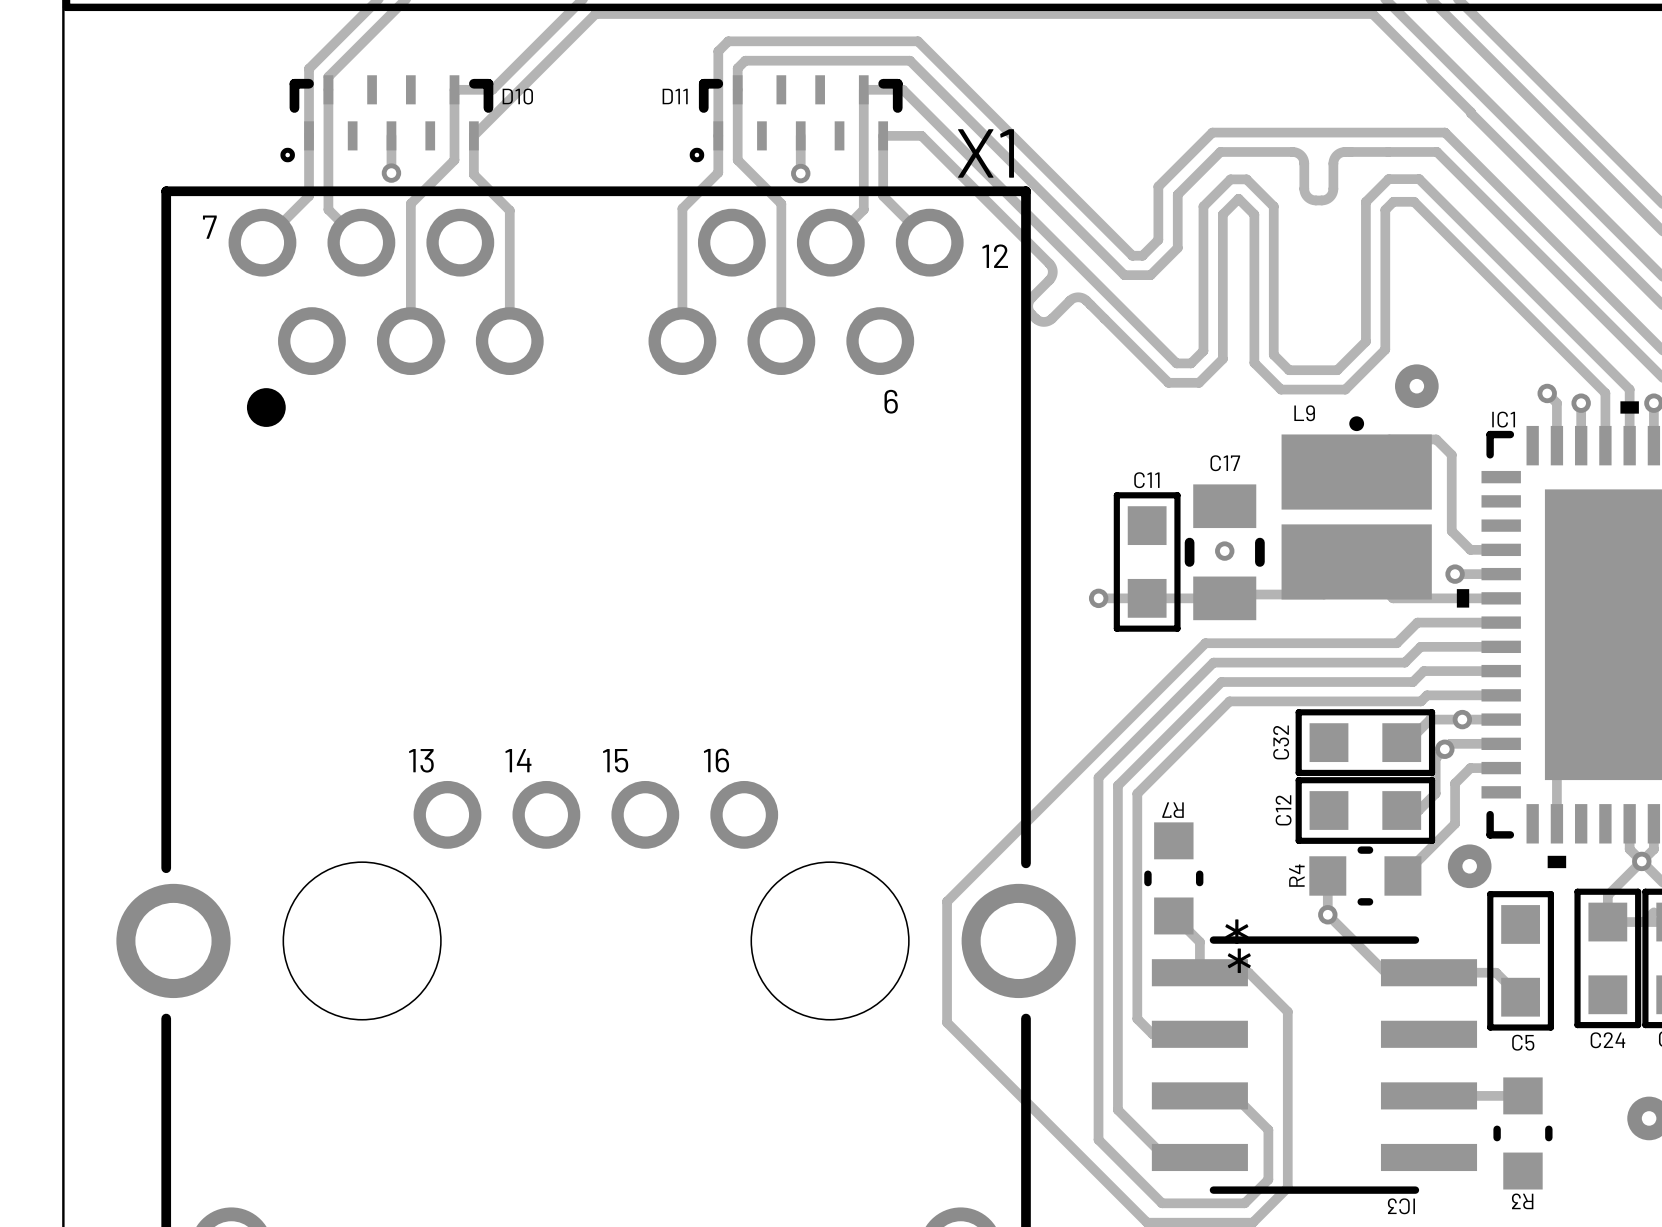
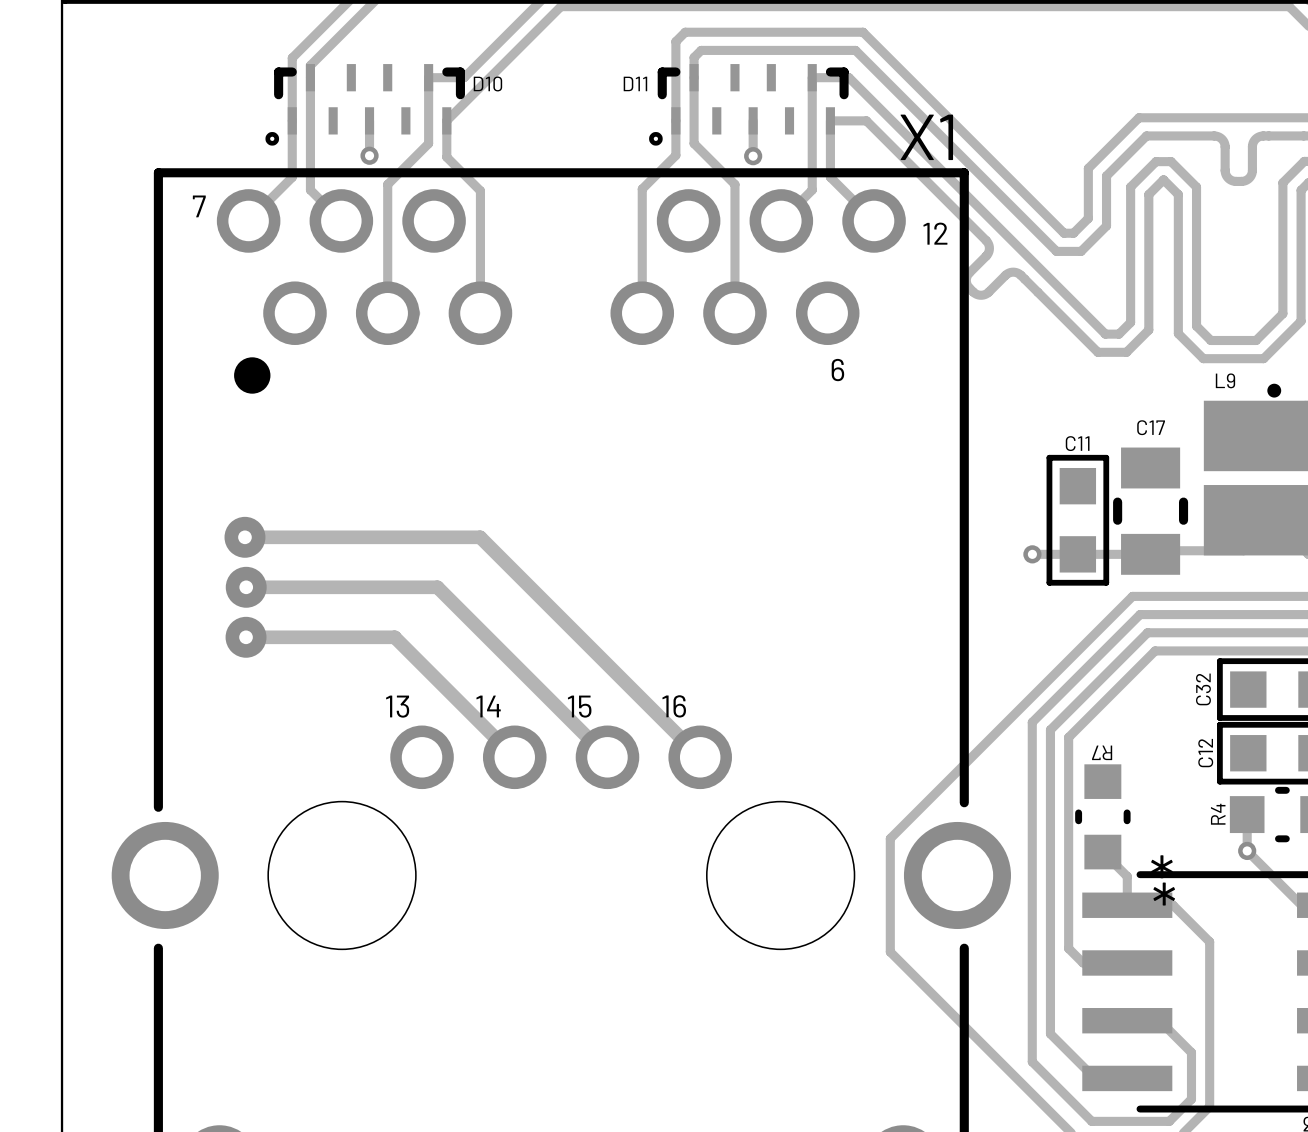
via: (1224, 551) -> none
track: none -> (244, 537) (480, 537) (700, 757)
via: none -> (244, 537)
track: none -> (246, 587) (437, 587) (607, 757)
via: none -> (246, 587)
track: none -> (246, 637) (394, 637) (514, 757)
via: none -> (246, 637)

